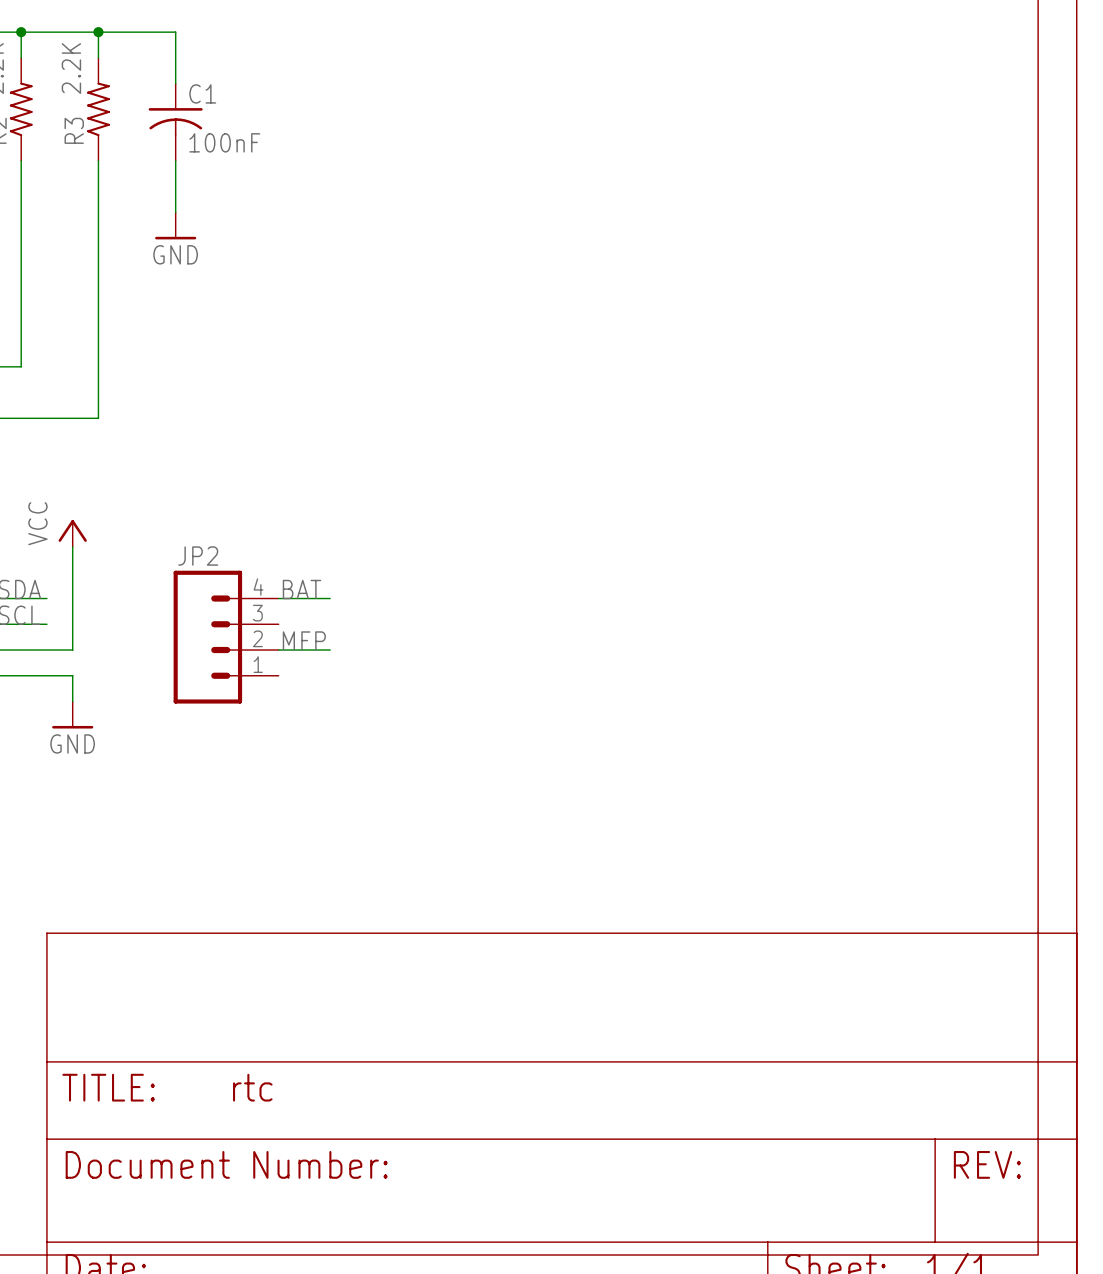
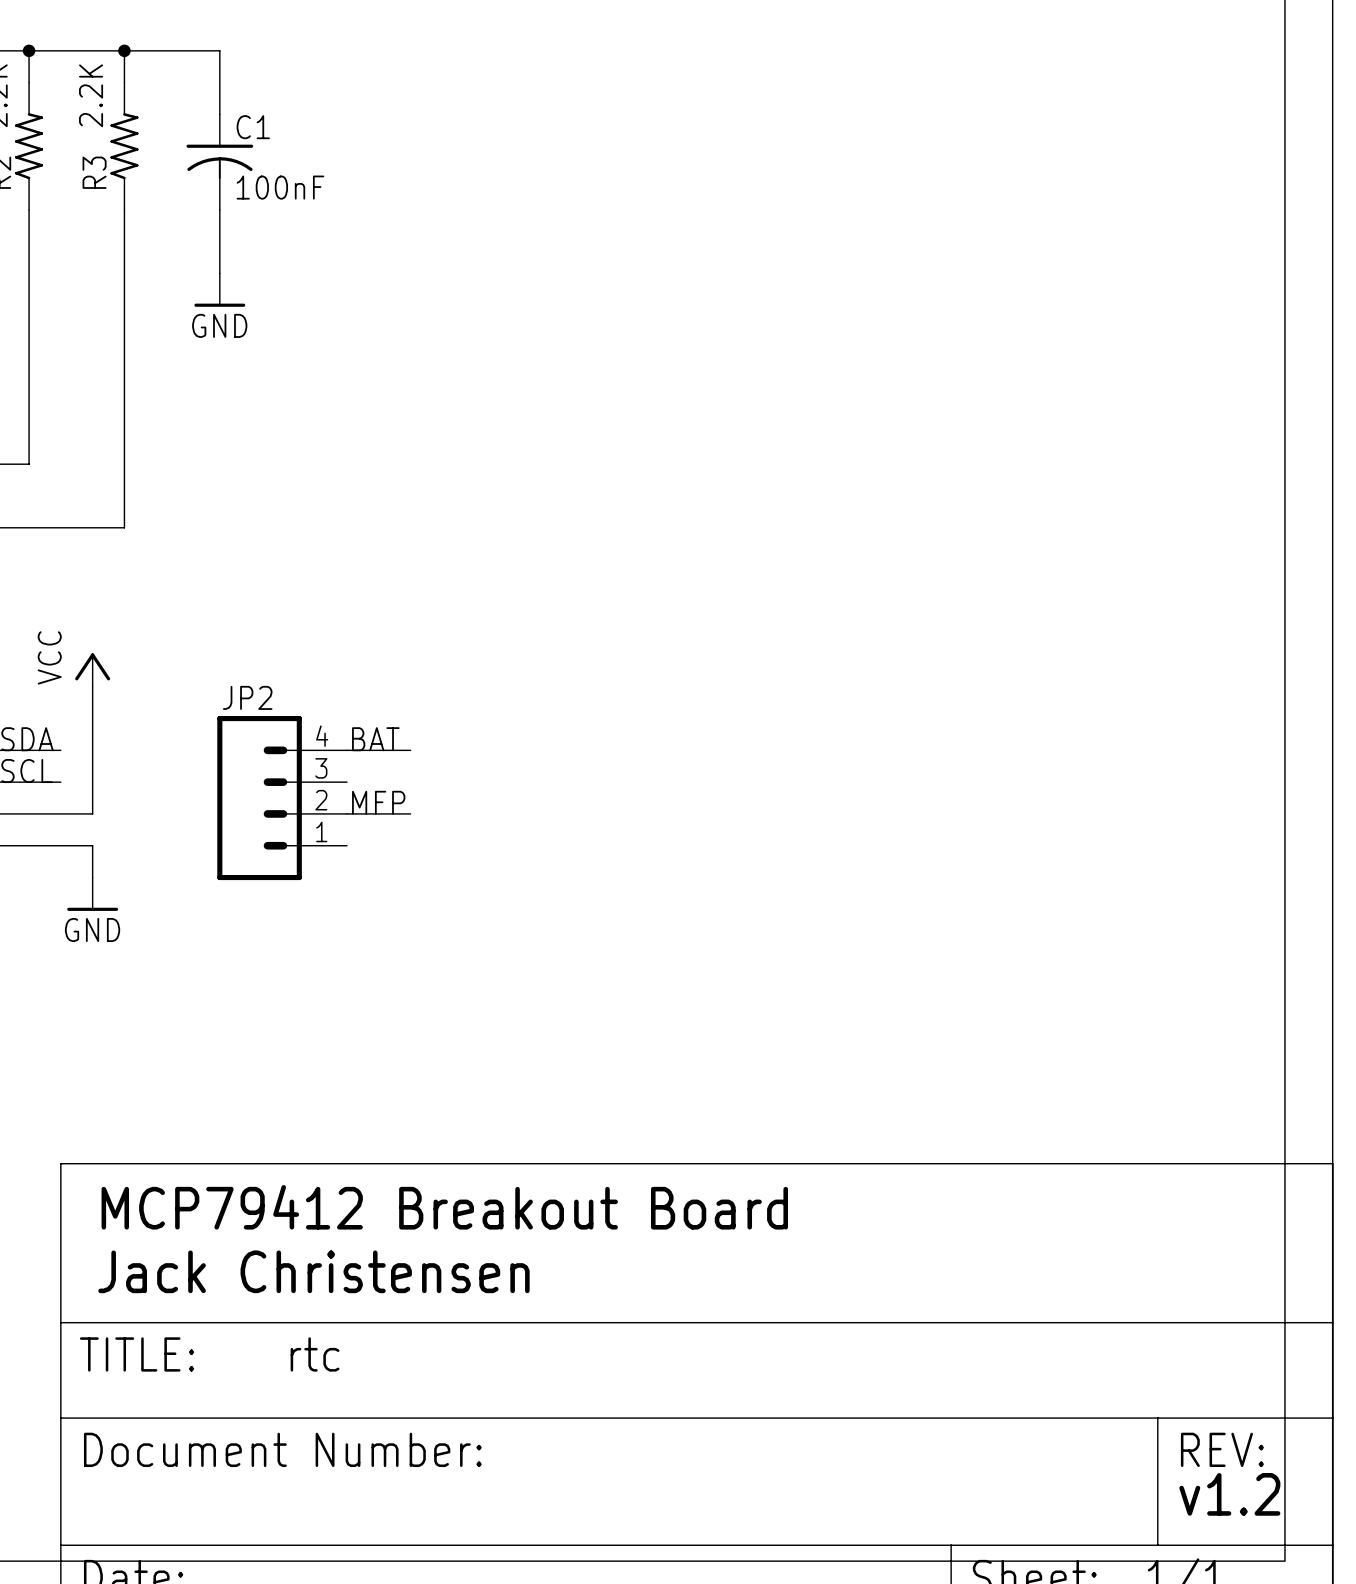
text: none -> MCP79412 Breakout Board (444, 1207)
text: none -> Jack Christensen (313, 1271)
text: none -> v1.2 (1229, 1494)

